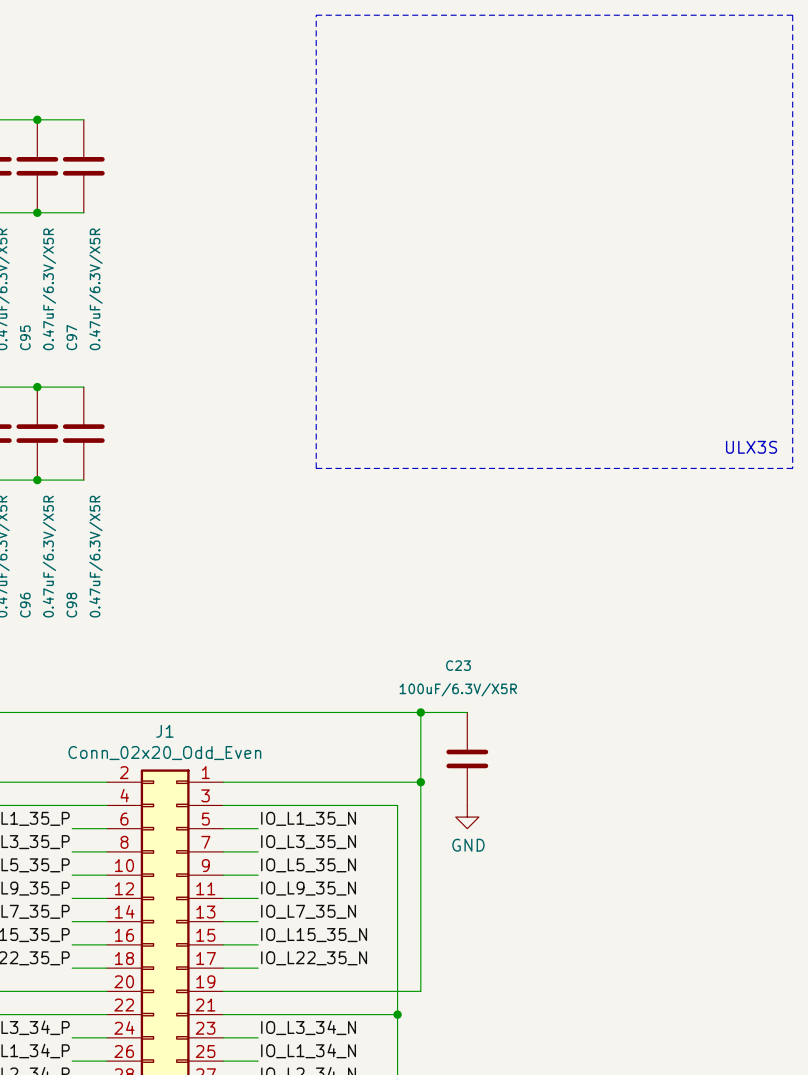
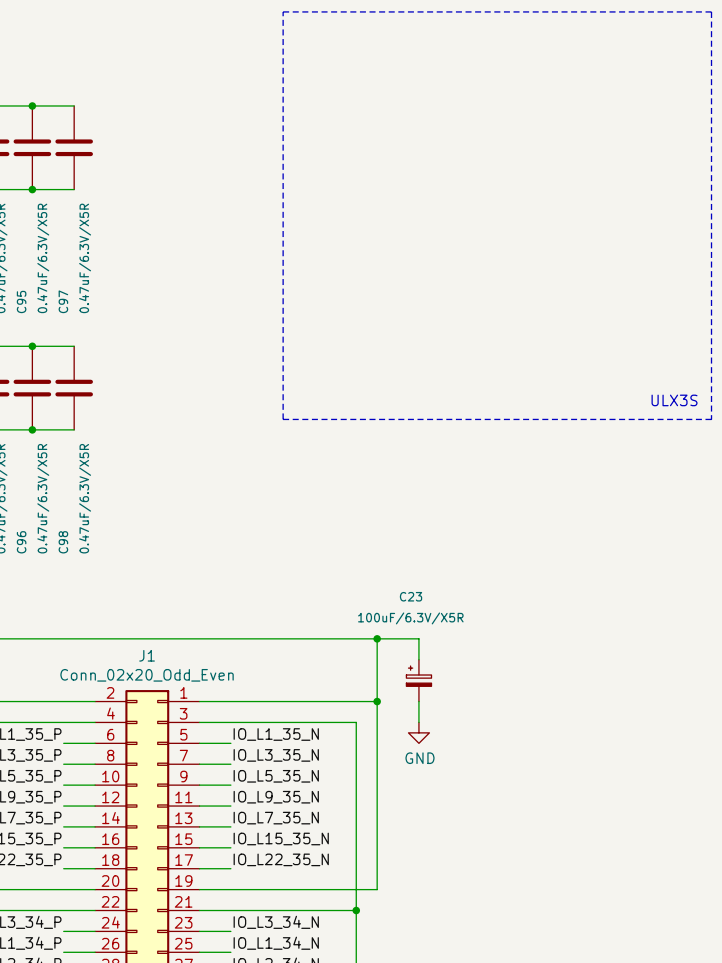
C23 symbol: [446, 712, 489, 806] -> [406, 659, 432, 702]

